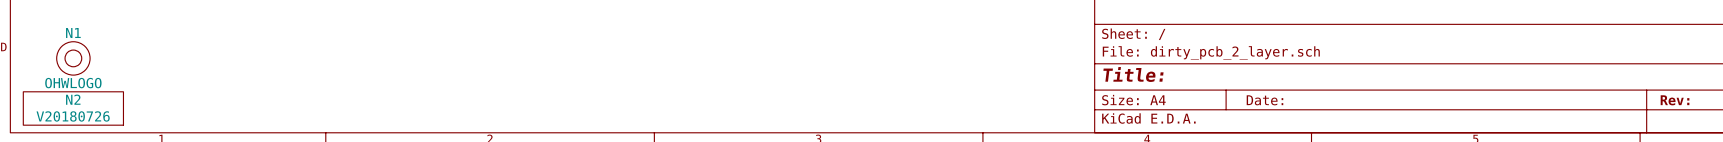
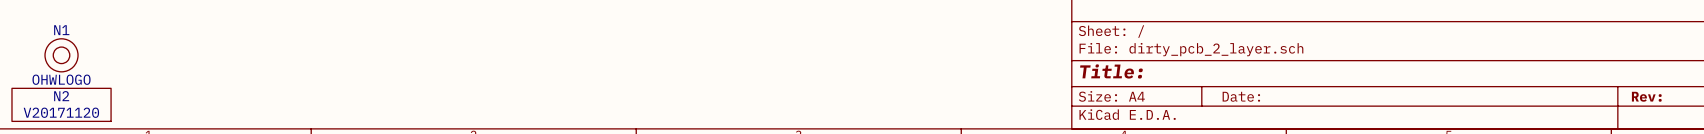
N2 value: V20180726 (73, 116) -> V20171120 (61, 112)

